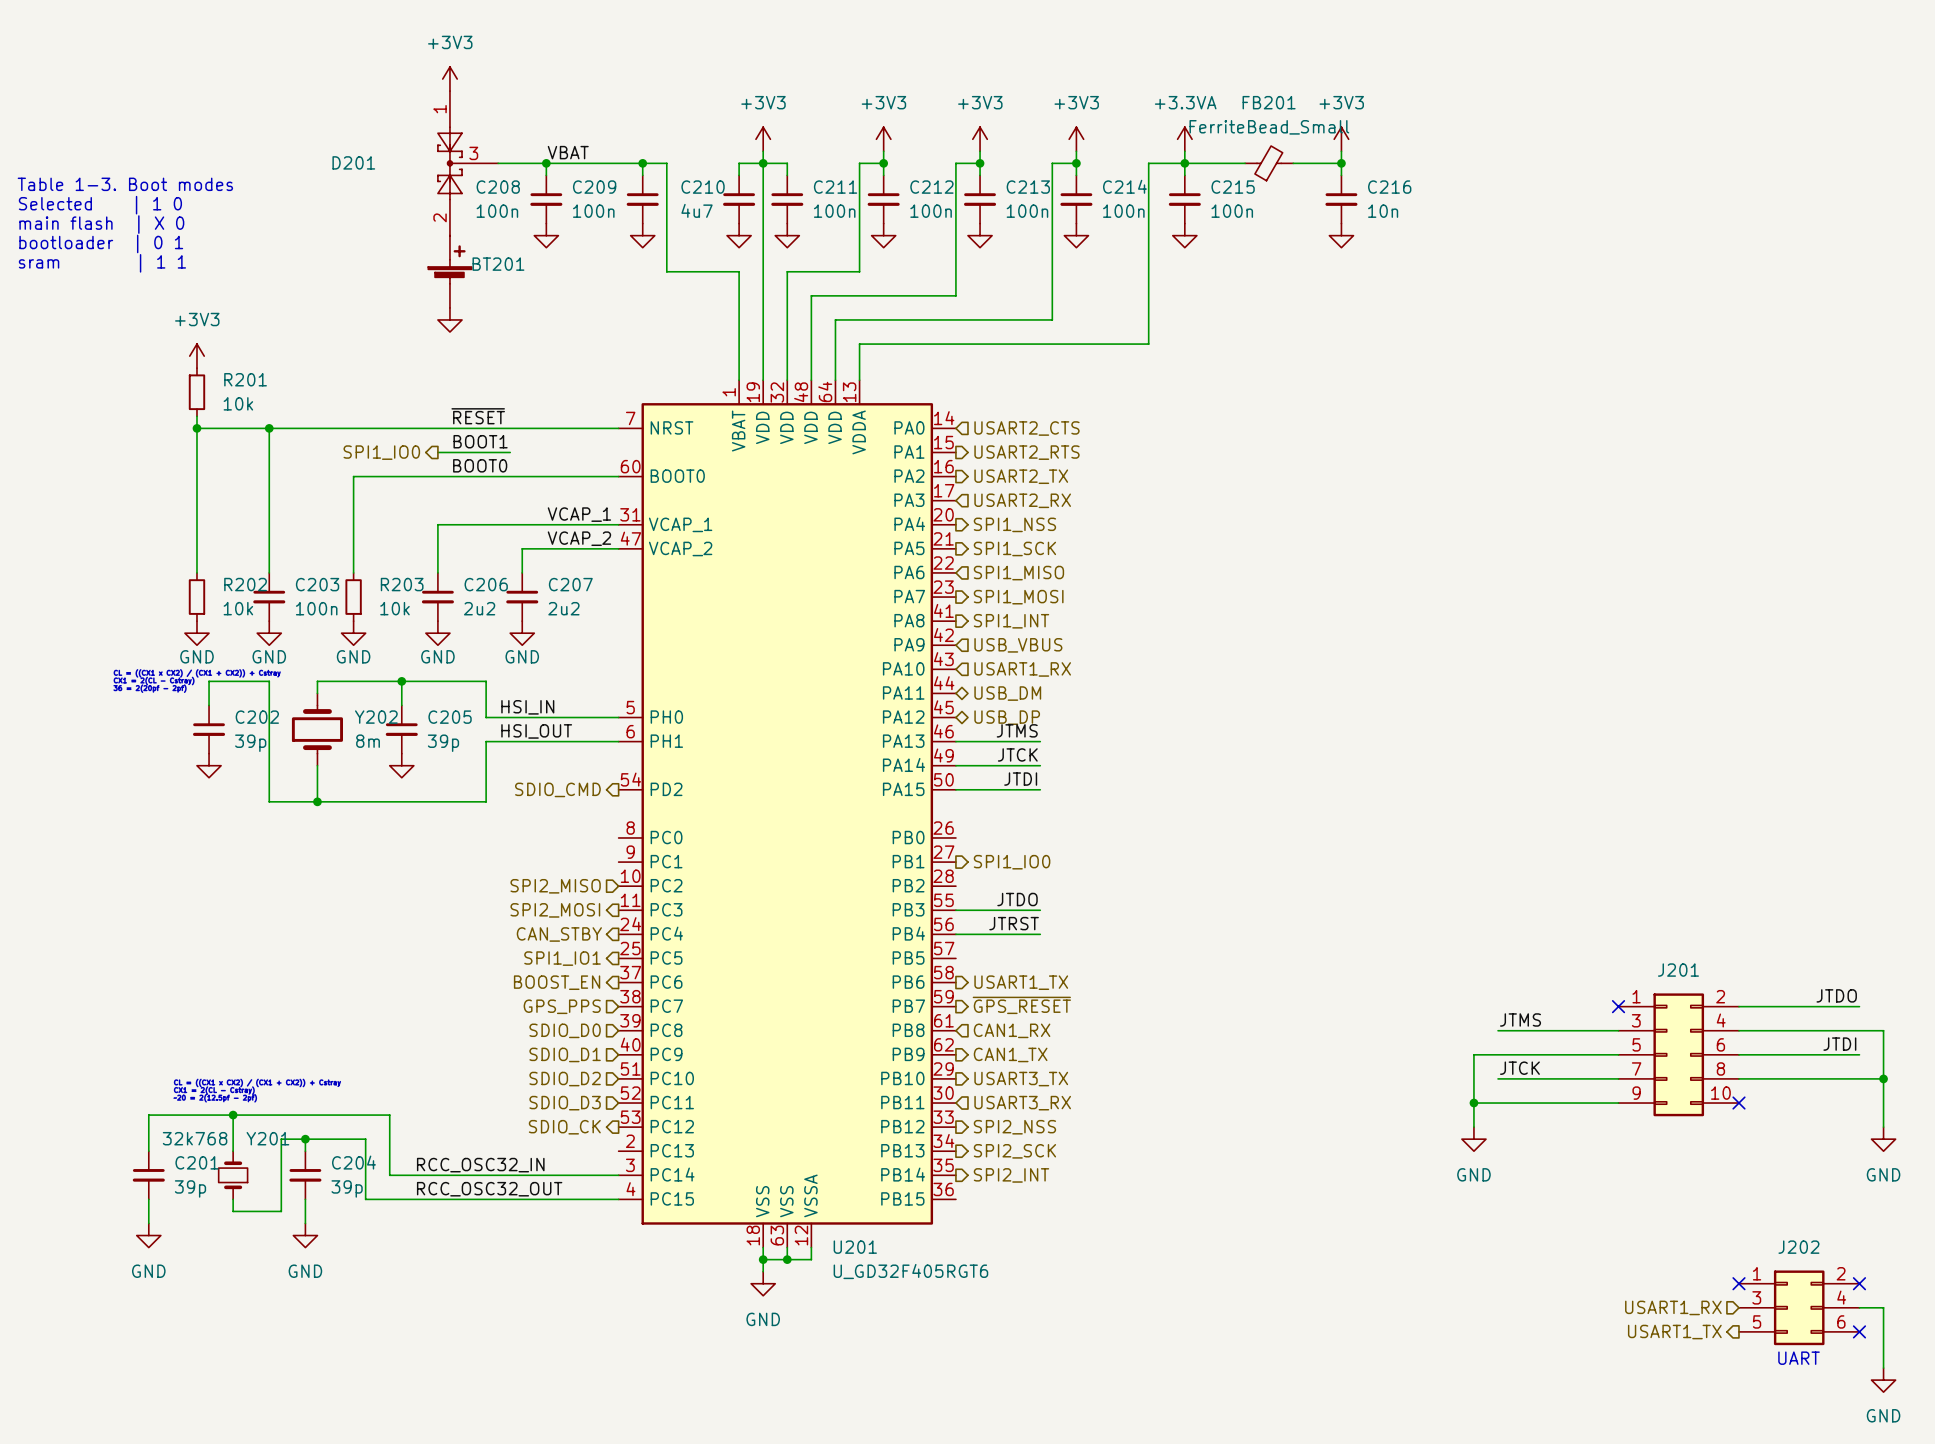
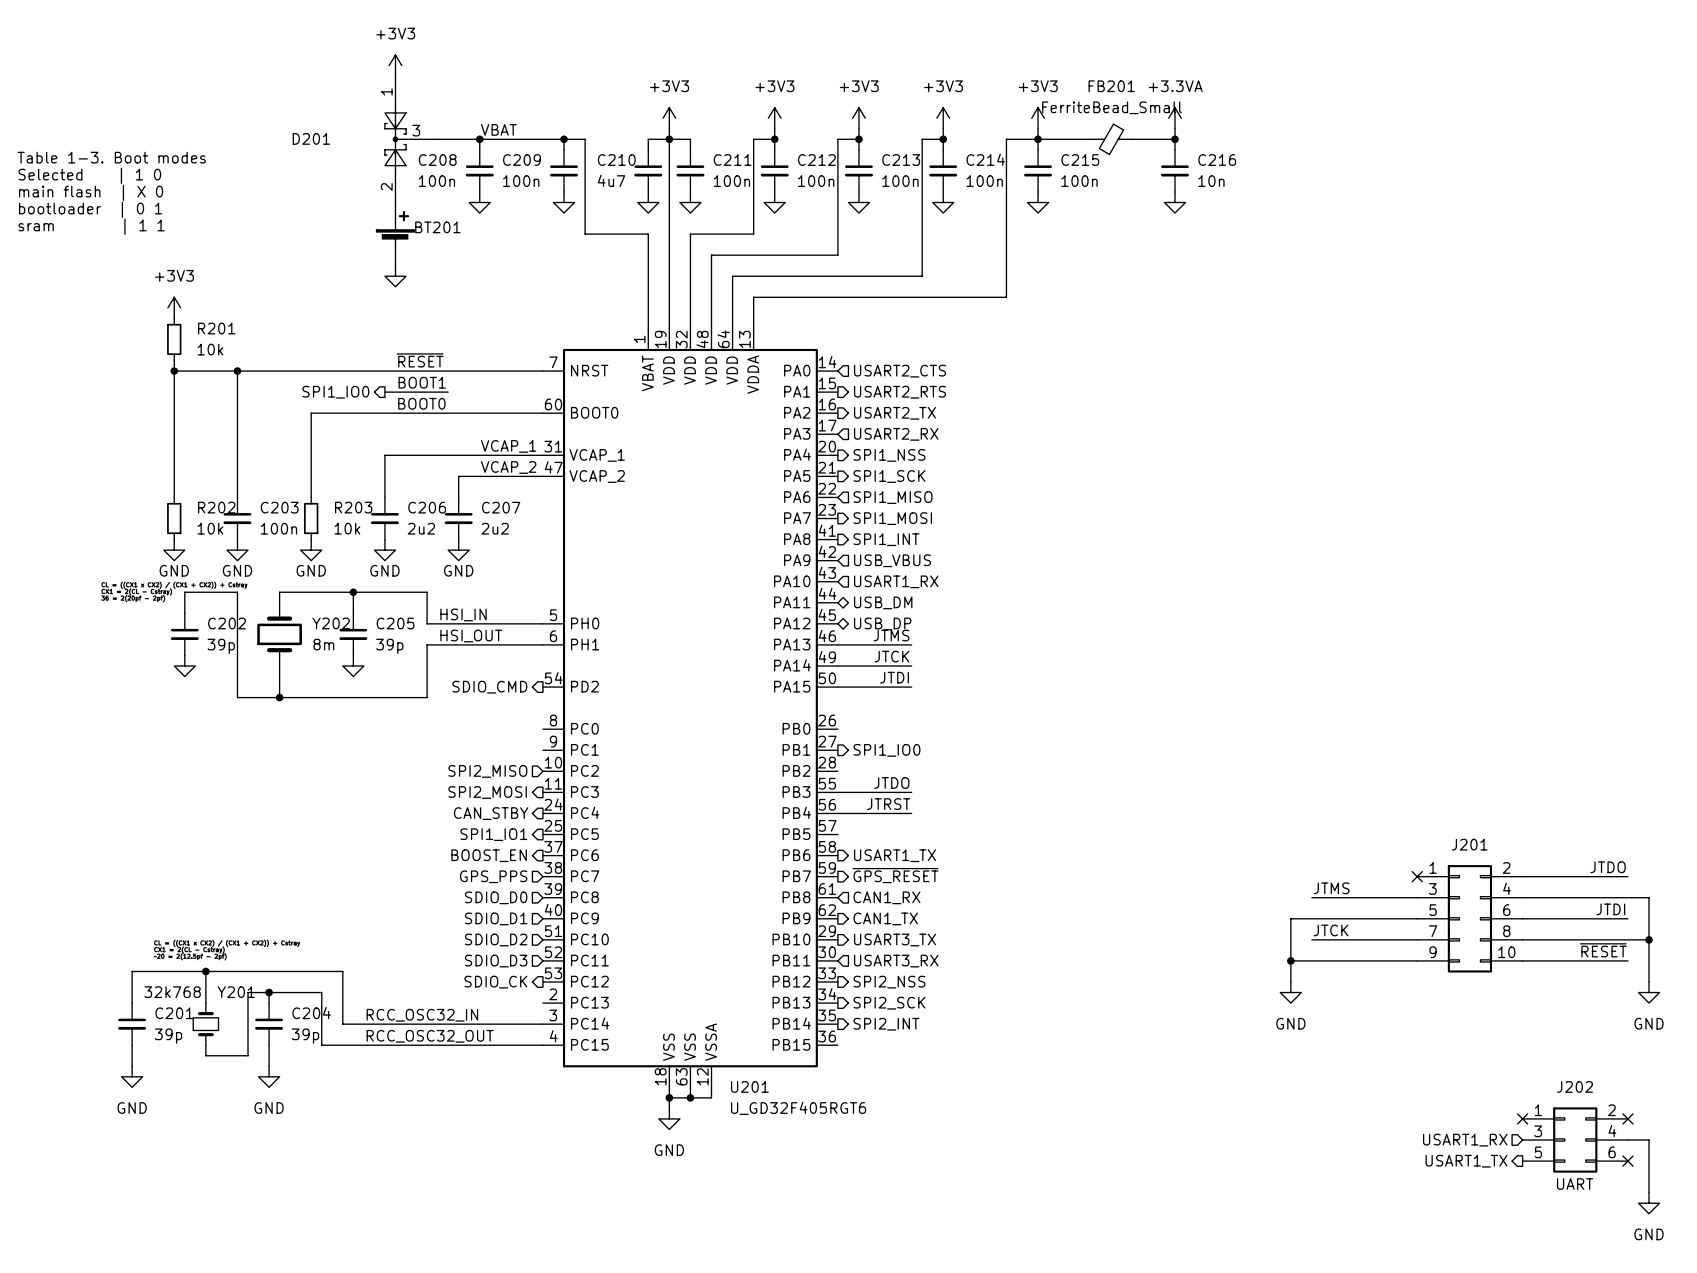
power symbol: +3.3VA (1184, 139) -> +3V3 (1038, 118)
power symbol: +3V3 (1341, 139) -> +3.3VA (1174, 118)
label: none -> ~{RESET} (1603, 950)
wire: none -> (1522, 960) (1627, 960)
no-connect mark: (1738, 1103) -> none

